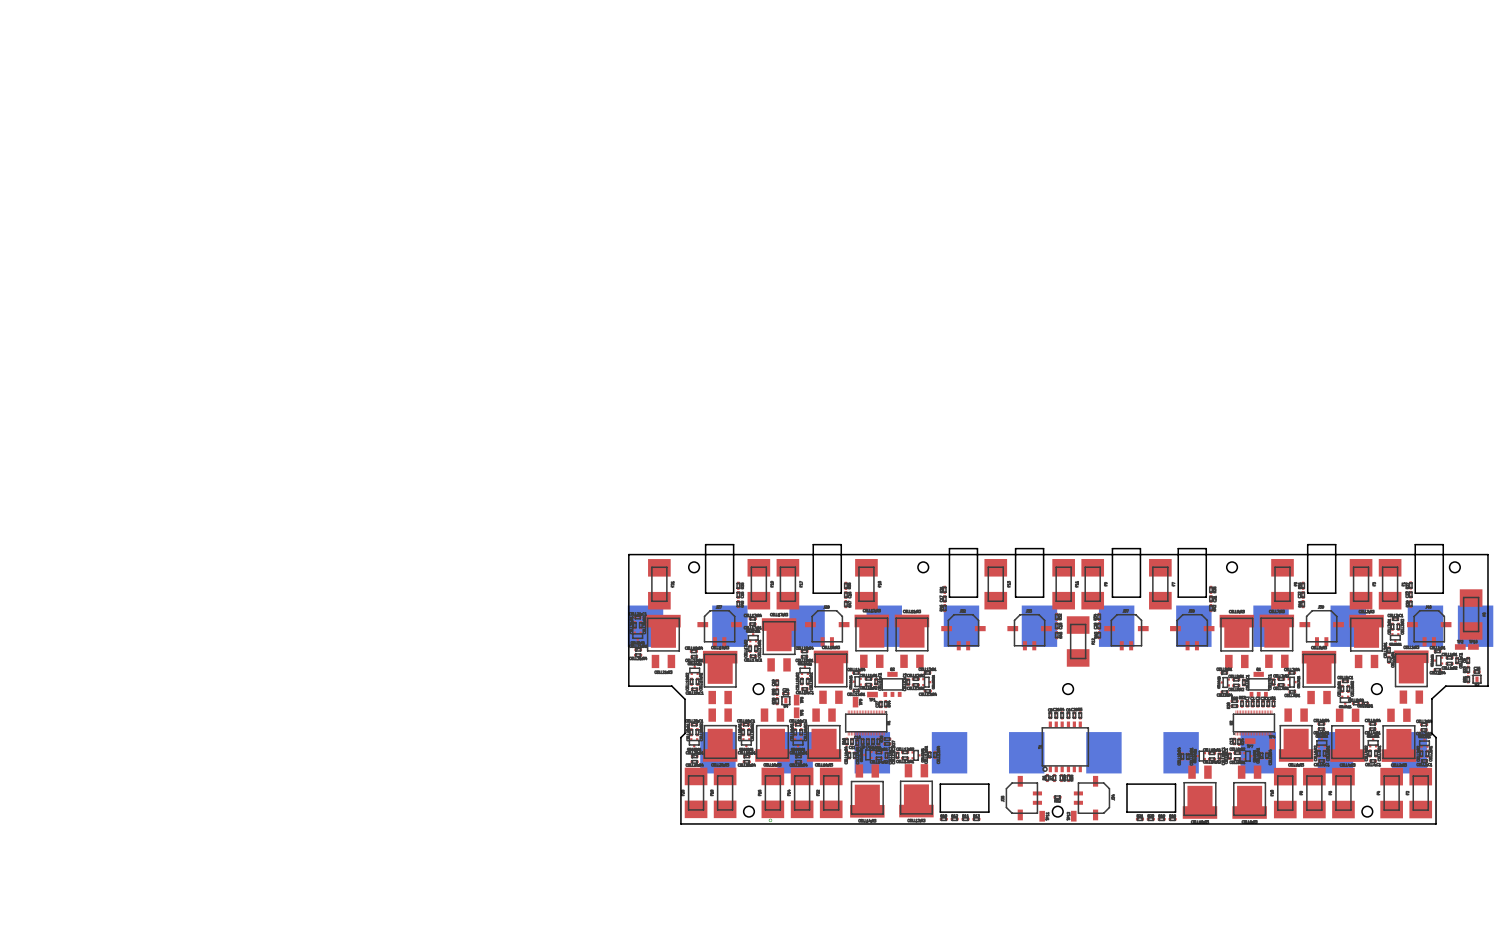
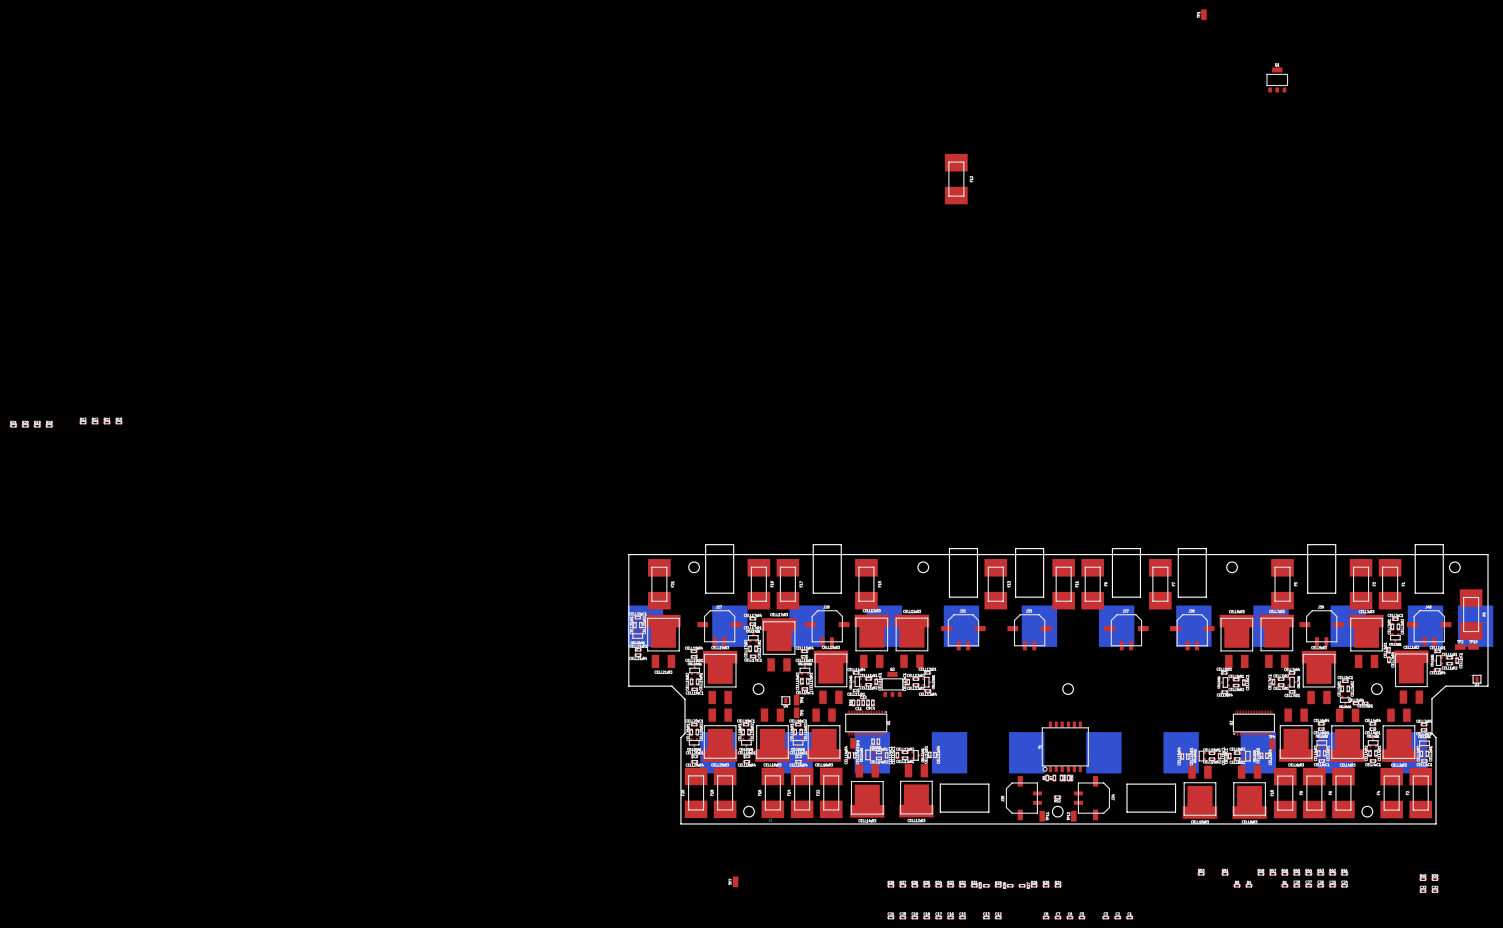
part rotation: 0° (738, 585) -> 90° clockwise (1046, 885)
part position: (738, 585) -> (1046, 885)
part rotation: 0° (845, 585) -> 90° clockwise (1034, 885)
part position: (845, 585) -> (1034, 885)
part rotation: 0° (1303, 585) -> 90° clockwise (914, 885)
part position: (1303, 585) -> (914, 885)
part rotation: 0° (1410, 585) -> 90° clockwise (902, 885)
part position: (1410, 585) -> (902, 885)
part rotation: 0° (944, 589) -> 90° clockwise (974, 885)
part position: (944, 589) -> (974, 885)
part rotation: 0° (1210, 589) -> 90° clockwise (926, 885)
part position: (1210, 589) -> (926, 885)
part rotation: 0° (738, 594) -> 90° clockwise (962, 917)
part position: (738, 594) -> (962, 917)
part rotation: 0° (845, 594) -> 90° clockwise (950, 917)
part position: (845, 594) -> (950, 917)
part rotation: 0° (1303, 594) -> 90° clockwise (1434, 891)
part position: (1303, 594) -> (1434, 891)
part rotation: 0° (1410, 594) -> 90° clockwise (1423, 891)
part position: (1410, 594) -> (1423, 891)
part rotation: 0° (944, 598) -> 90° clockwise (938, 917)
part position: (944, 598) -> (938, 917)
part rotation: 0° (1210, 598) -> 90° clockwise (890, 917)
part position: (1210, 598) -> (890, 917)
part rotation: 0° (1410, 603) -> 90° clockwise (1434, 879)
part position: (1410, 603) -> (1434, 879)
part rotation: 0° (738, 604) -> 90° clockwise (1260, 873)
part position: (738, 604) -> (1260, 873)
part rotation: 0° (845, 604) -> 90° clockwise (1272, 873)
part position: (845, 604) -> (1272, 873)
part rotation: 0° (1303, 604) -> 90° clockwise (1344, 873)
part position: (1303, 604) -> (1344, 873)
part rotation: 0° (944, 608) -> 90° clockwise (1284, 873)
part position: (944, 608) -> (1284, 873)
part rotation: 0° (1210, 608) -> 90° clockwise (1332, 873)
part position: (1210, 608) -> (1332, 873)
part rotation: 0° (1056, 616) -> 90° clockwise (962, 885)
part position: (1056, 616) -> (962, 885)
part rotation: 0° (1099, 616) -> 90° clockwise (938, 885)
part position: (1099, 616) -> (938, 885)
part rotation: 0° (1056, 626) -> 90° clockwise (926, 917)
part position: (1056, 626) -> (926, 917)
part rotation: 0° (1099, 626) -> 90° clockwise (902, 917)
part position: (1099, 626) -> (902, 917)
part rotation: 0° (1056, 635) -> 90° clockwise (1296, 873)
part position: (1056, 635) -> (1296, 873)
part rotation: 0° (1099, 635) -> 90° clockwise (1320, 873)
part position: (1099, 635) -> (1320, 873)
part position: (1078, 641) -> (956, 179)
part rotation: 0° (1468, 660) -> 90° clockwise (1046, 917)
part position: (1468, 660) -> (1046, 917)
part rotation: 0° (1468, 669) -> 90° clockwise (950, 885)
part position: (1468, 669) -> (950, 885)
part position: (1476, 671) -> (1332, 885)
part rotation: 0° (1468, 679) -> 90° clockwise (1225, 873)
part position: (1468, 679) -> (1225, 873)
part rotation: 0° (777, 682) -> 90° clockwise (914, 917)
part position: (777, 682) -> (914, 917)
part position: (1258, 684) -> (1277, 79)
part rotation: 0° (777, 691) -> 90° clockwise (1423, 879)
part position: (777, 691) -> (1423, 879)
part position: (785, 693) -> (1344, 885)
part rotation: 0° (872, 694) -> 90° clockwise (1203, 14)
part position: (872, 694) -> (1203, 14)
part rotation: 0° (777, 701) -> 90° clockwise (890, 885)
part position: (777, 701) -> (890, 885)
part position: (1234, 701) -> (998, 885)
part position: (855, 702) -> (852, 743)
part rotation: 0° (1242, 703) -> 90° clockwise (1201, 873)
part position: (1242, 703) -> (1201, 873)
part rotation: 0° (1247, 703) -> 90° clockwise (1058, 917)
part position: (1247, 703) -> (1058, 917)
part rotation: 0° (1252, 703) -> 90° clockwise (1129, 917)
part position: (1252, 703) -> (1129, 917)
part rotation: 0° (1257, 703) -> 90° clockwise (1117, 917)
part position: (1257, 703) -> (1117, 917)
part rotation: 0° (1263, 703) -> 90° clockwise (1105, 917)
part position: (1263, 703) -> (1105, 917)
part rotation: 0° (1268, 703) -> 90° clockwise (998, 917)
part position: (1268, 703) -> (998, 917)
part rotation: 0° (1273, 703) -> 90° clockwise (1284, 885)
part position: (1273, 703) -> (1284, 885)
part rotation: 0° (880, 704) -> 90° clockwise (1308, 885)
part position: (880, 704) -> (1308, 885)
part rotation: 0° (885, 704) -> 90° clockwise (1308, 873)
part position: (885, 704) -> (1308, 873)
part position: (1234, 706) -> (986, 885)
part rotation: 0° (1050, 715) -> 90° clockwise (1081, 917)
part position: (1050, 715) -> (1081, 917)
part rotation: 0° (1056, 715) -> 90° clockwise (1320, 885)
part position: (1056, 715) -> (1320, 885)
part rotation: 0° (1062, 715) -> 90° clockwise (1249, 885)
part position: (1062, 715) -> (1249, 885)
part rotation: 0° (1068, 715) -> 90° clockwise (1069, 917)
part position: (1068, 715) -> (1069, 917)
part rotation: 0° (1074, 715) -> 90° clockwise (1296, 885)
part position: (1074, 715) -> (1296, 885)
part rotation: 0° (1080, 715) -> 90° clockwise (1237, 885)
part position: (1080, 715) -> (1237, 885)
part position: (887, 739) -> (1010, 885)
part position: (846, 741) -> (853, 702)
part position: (852, 741) -> (858, 702)
part position: (862, 741) -> (868, 702)
part position: (867, 741) -> (872, 702)
part rotation: 0° (1234, 741) -> 90° clockwise (986, 917)
part position: (1234, 741) -> (986, 917)
part rotation: 0° (1239, 741) -> 90° clockwise (1058, 885)
part position: (1239, 741) -> (1058, 885)
part rotation: 0° (1250, 741) -> 90° clockwise (735, 881)
part position: (1250, 741) -> (735, 881)
part position: (857, 742) -> (863, 702)
part position: (887, 743) -> (1022, 885)
part position: (943, 819) -> (118, 422)
part position: (954, 819) -> (95, 422)
part position: (965, 819) -> (106, 422)
part position: (976, 819) -> (83, 422)
part position: (1139, 819) -> (13, 425)
part position: (1150, 819) -> (25, 425)
part position: (1161, 819) -> (37, 425)
part position: (1172, 819) -> (49, 425)

